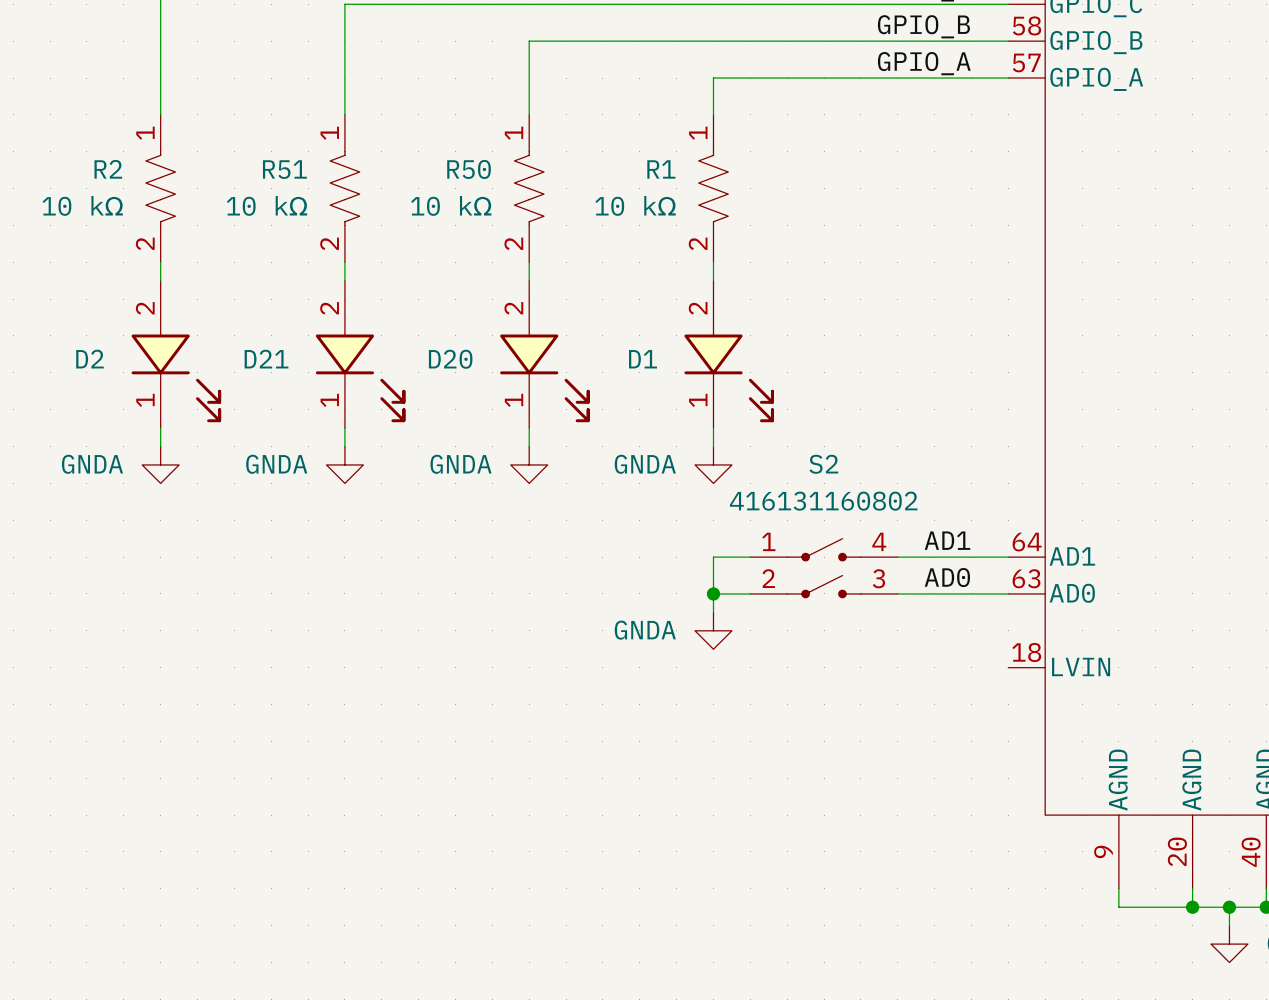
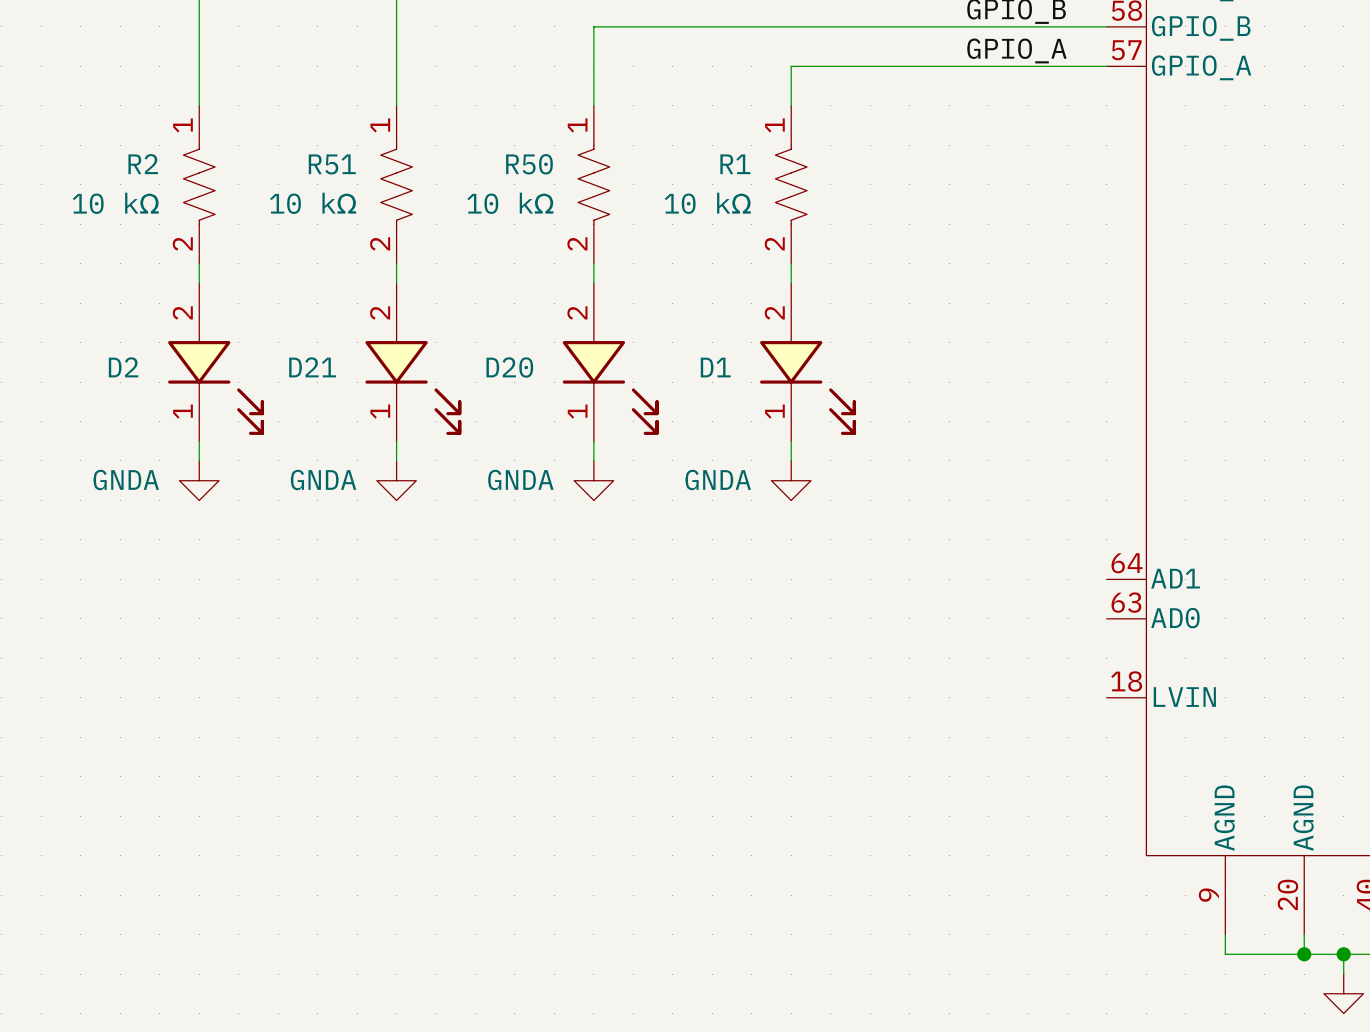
label: AD1 (947, 540) -> none
wire: (750, 557) (713, 557) (713, 612) -> none
wire: (897, 557) (1008, 557) -> none
S2: 416131160802 (824, 568) -> none
label: AD0 (947, 577) -> none
wire: (713, 593) (750, 593) -> none
junction: (713, 593) -> none
wire: (897, 593) (1008, 593) -> none
power symbol: GNDA (713, 630) -> none

